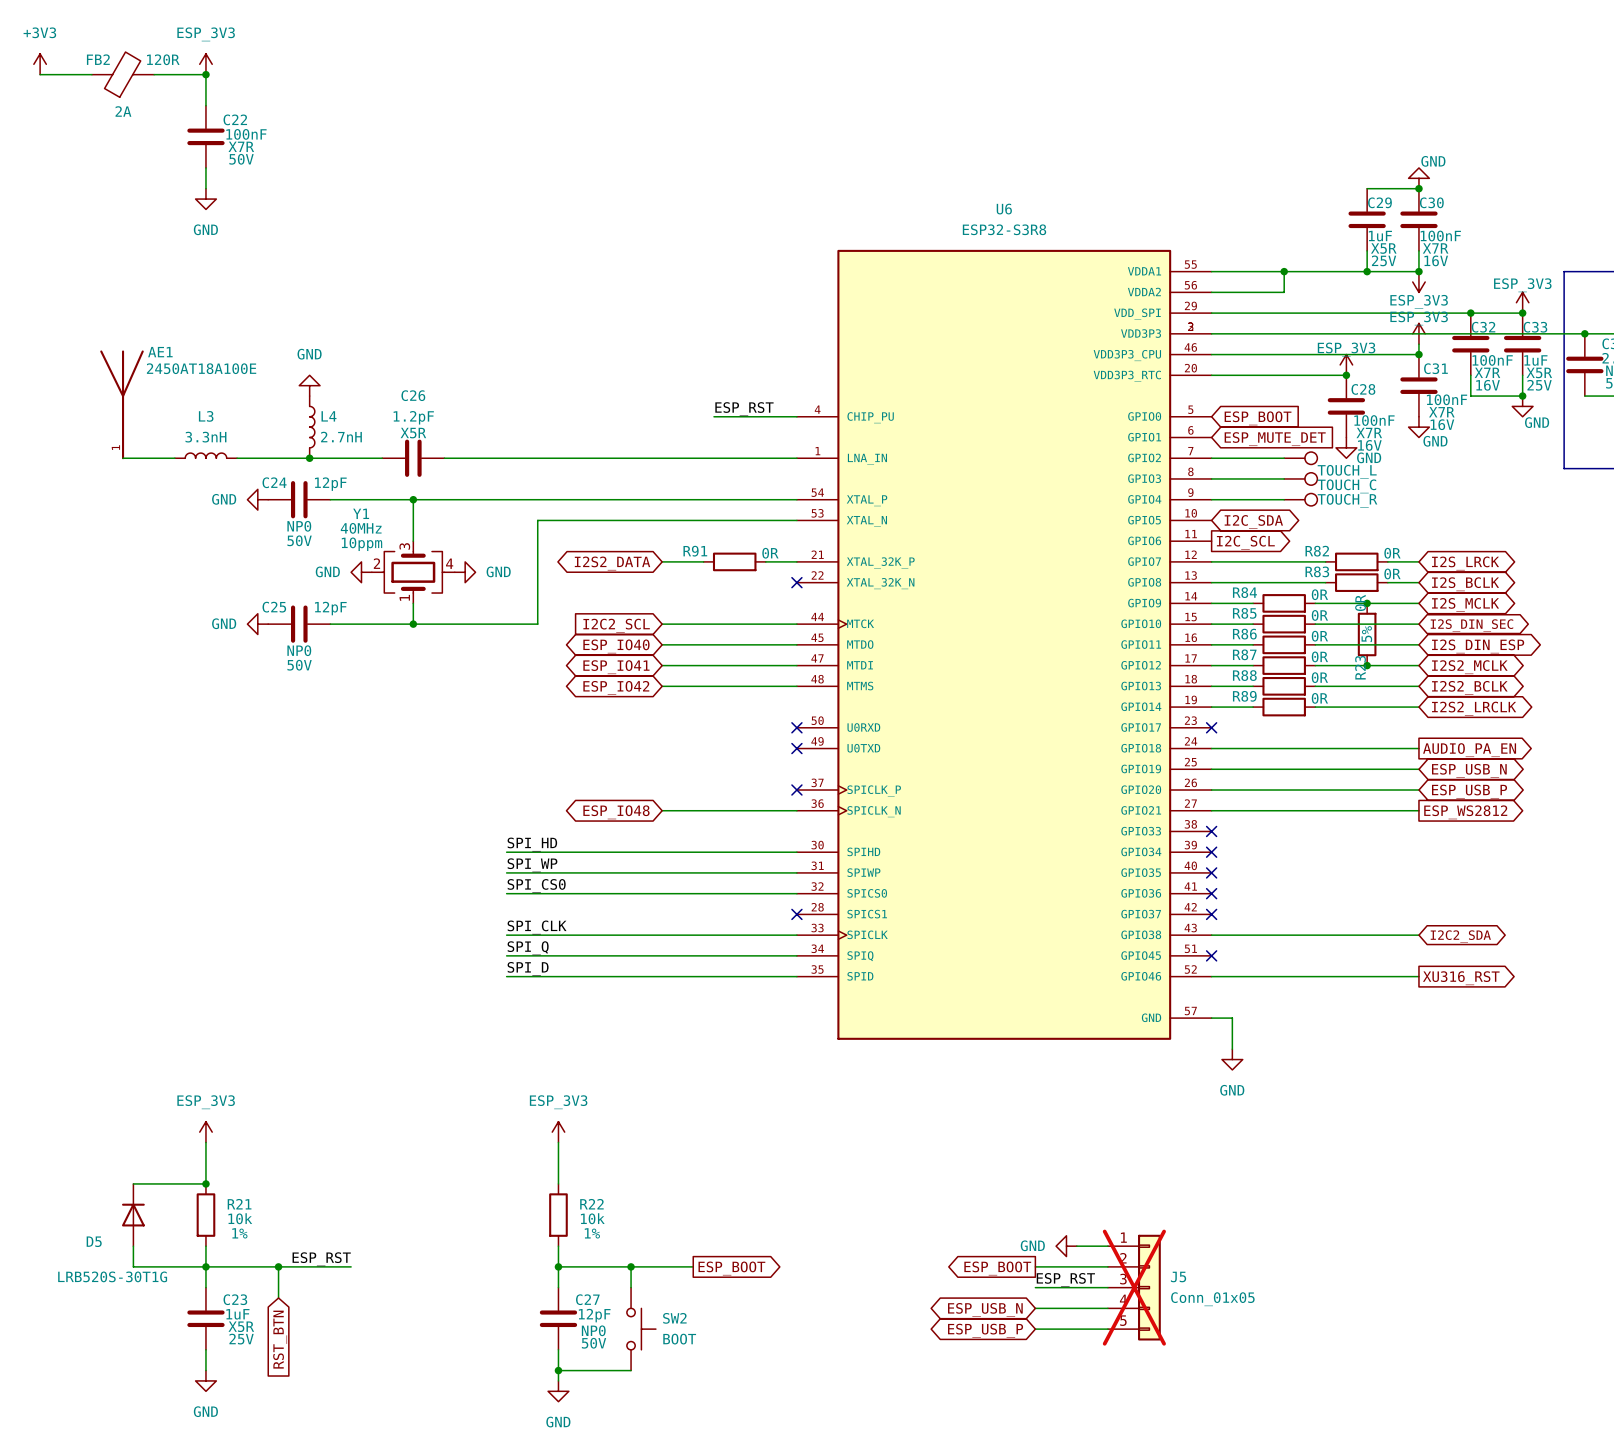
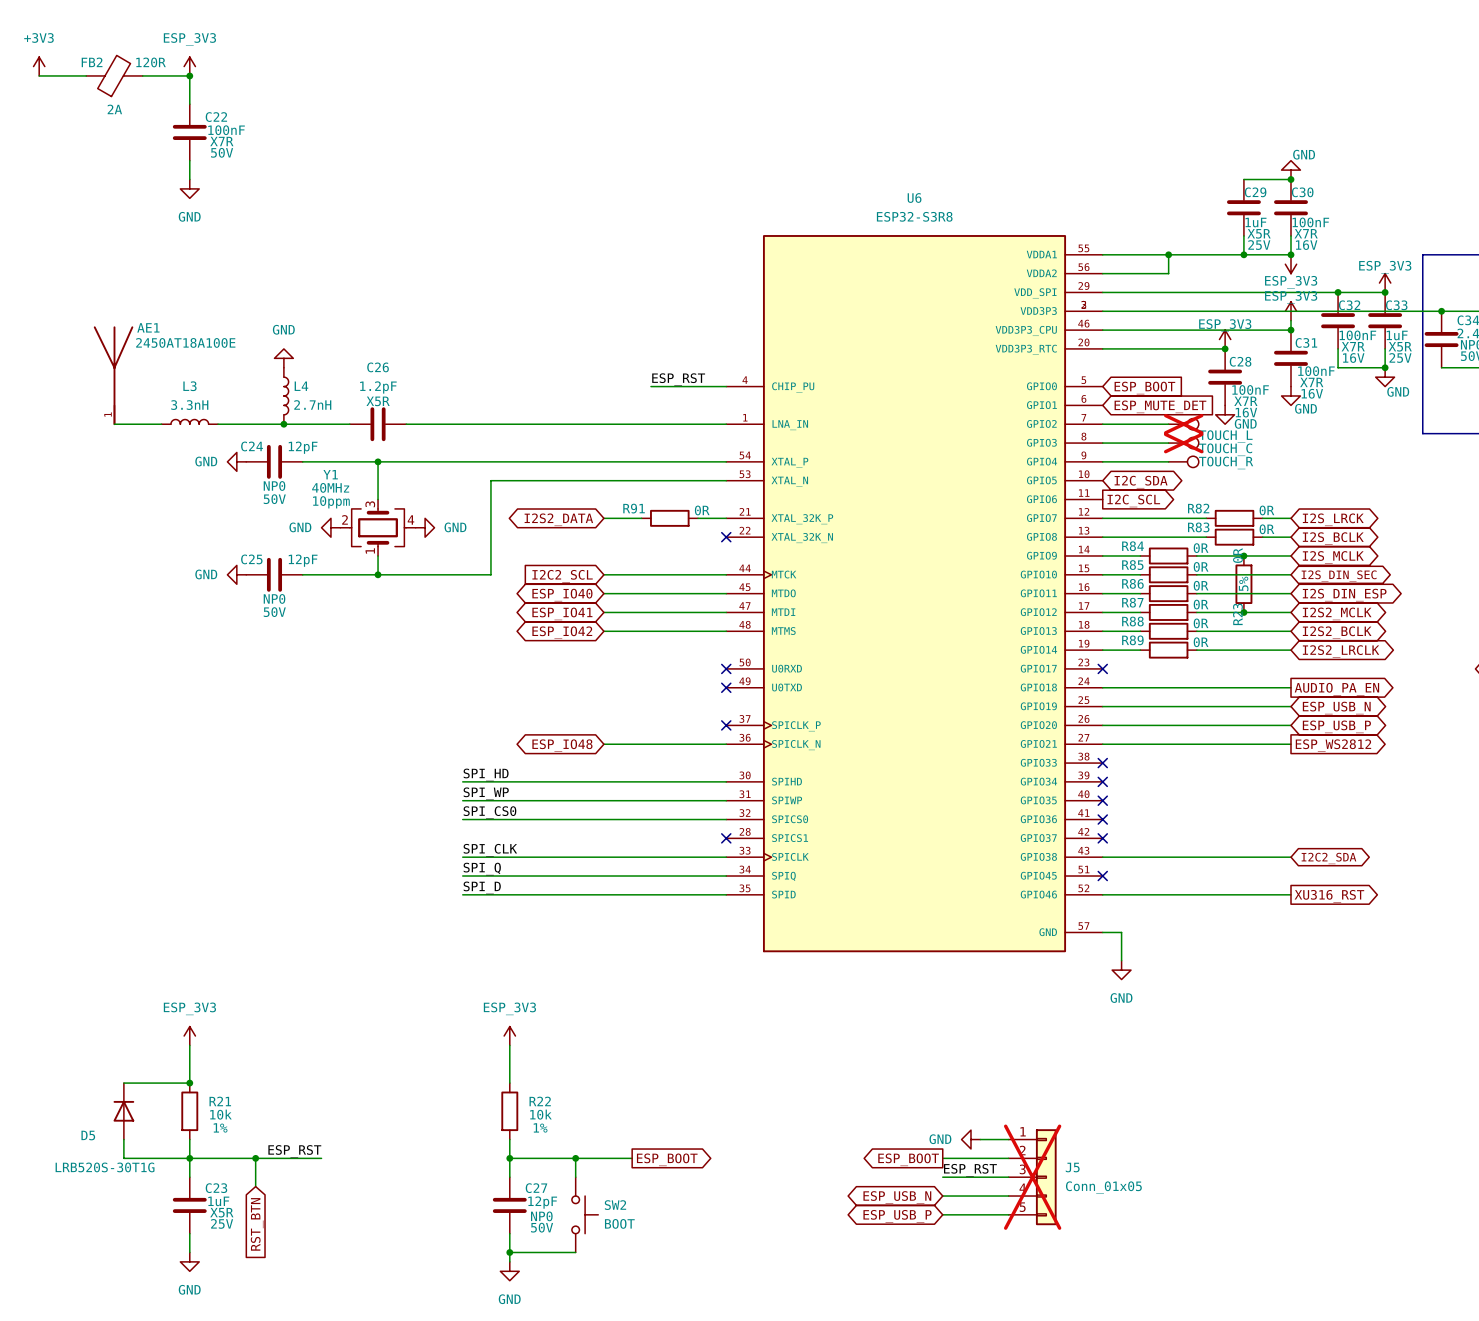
part do-not-place cross: none -> (1183, 424)
part do-not-place cross: none -> (1183, 443)

